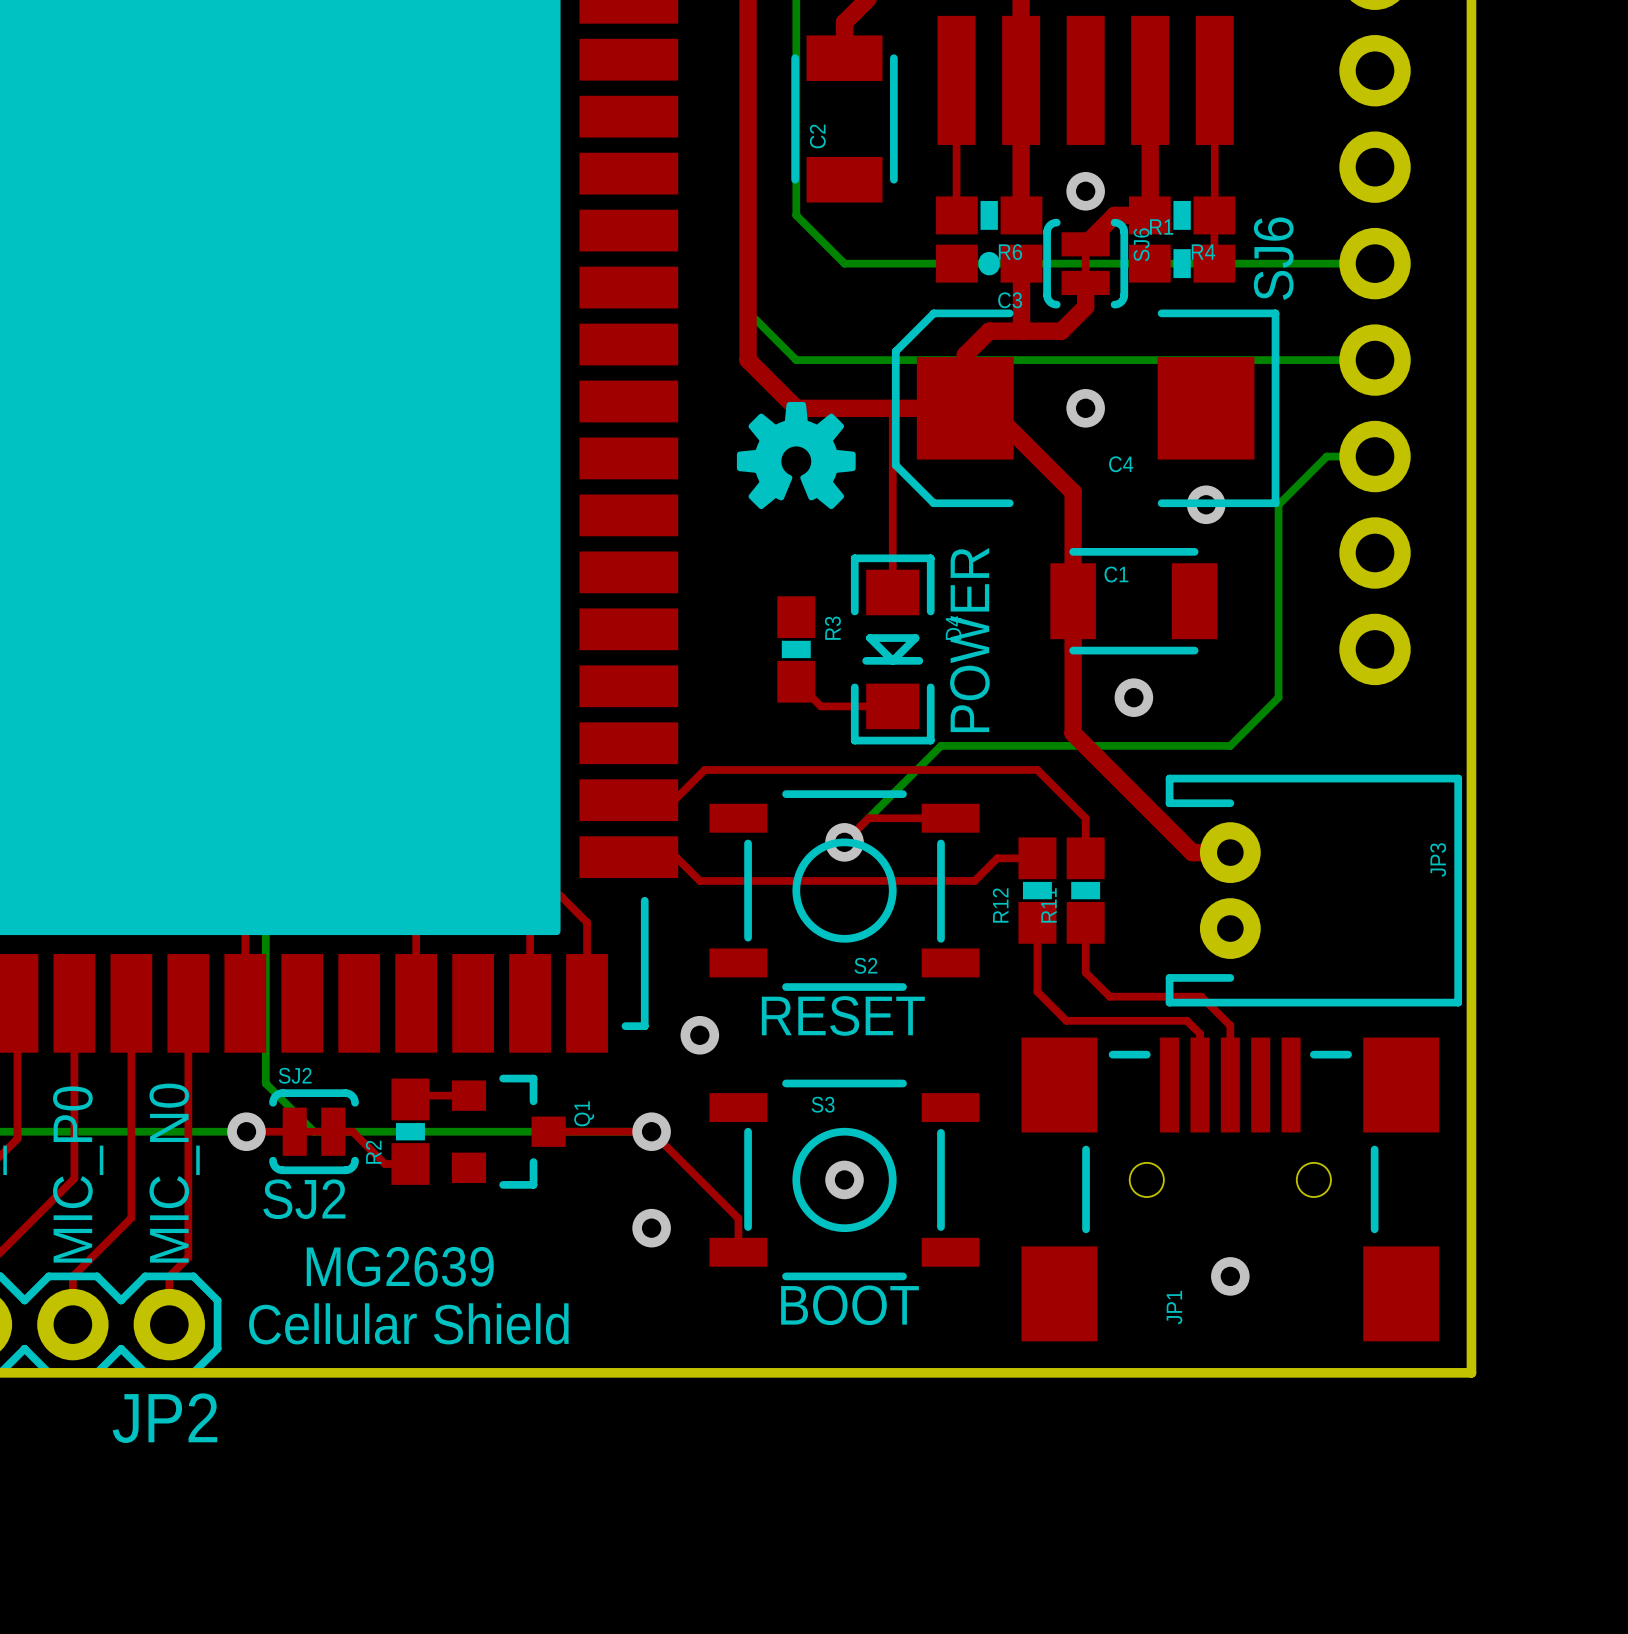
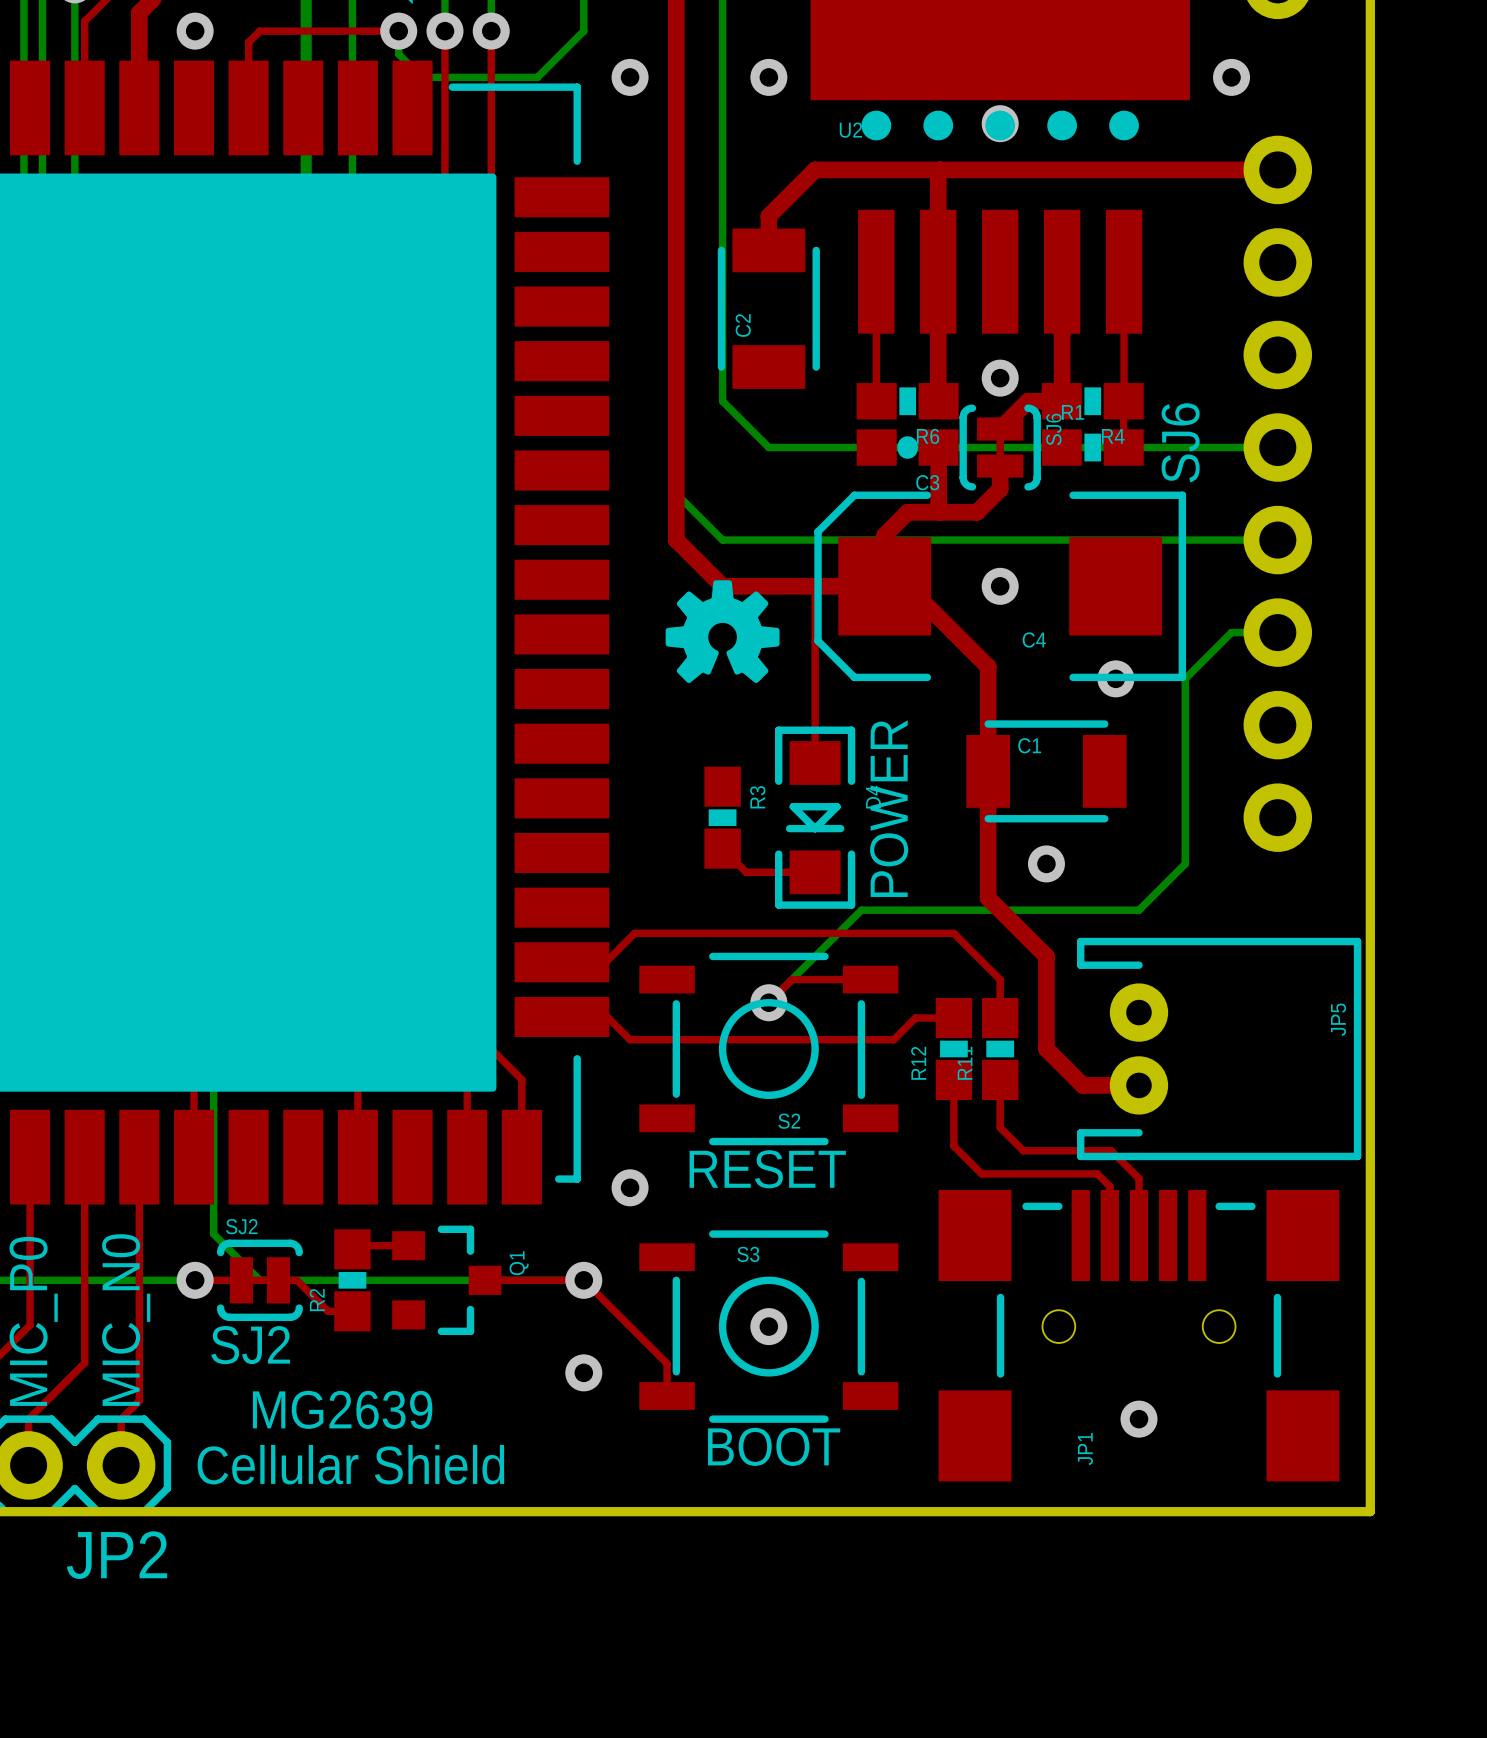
top track: (1133, 794) (1192, 852) (1230, 852) -> (1046, 956) (1046, 1049) (1082, 1085) (1138, 1085)
JP3 name: JP3 (1438, 860) -> JP5 (1338, 1019)

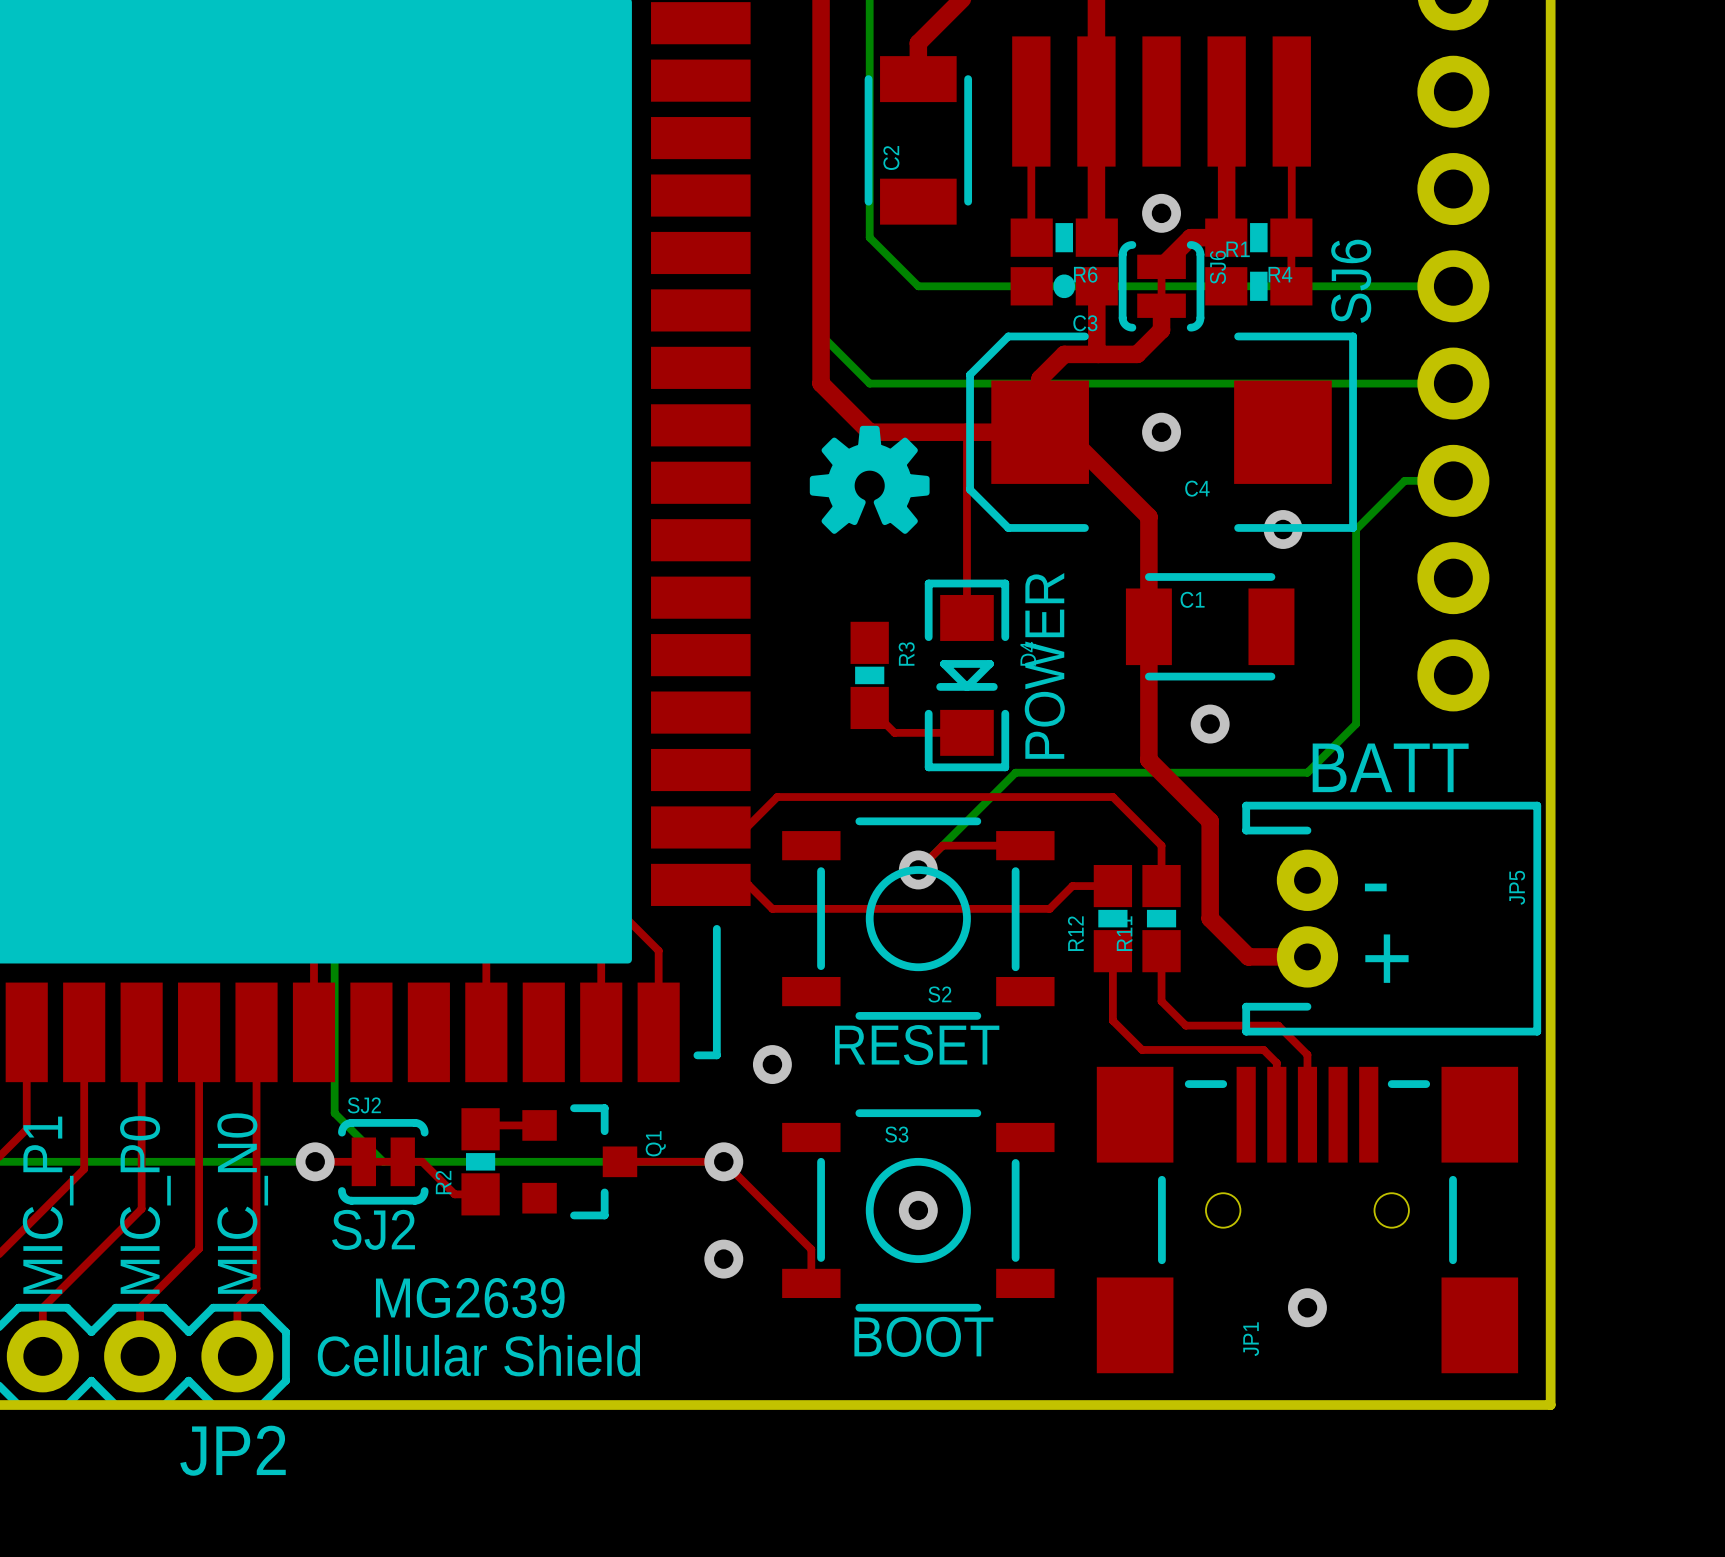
text: none -> BATT (1390, 767)
text: none -> - (1375, 887)
text: none -> + (1386, 958)

